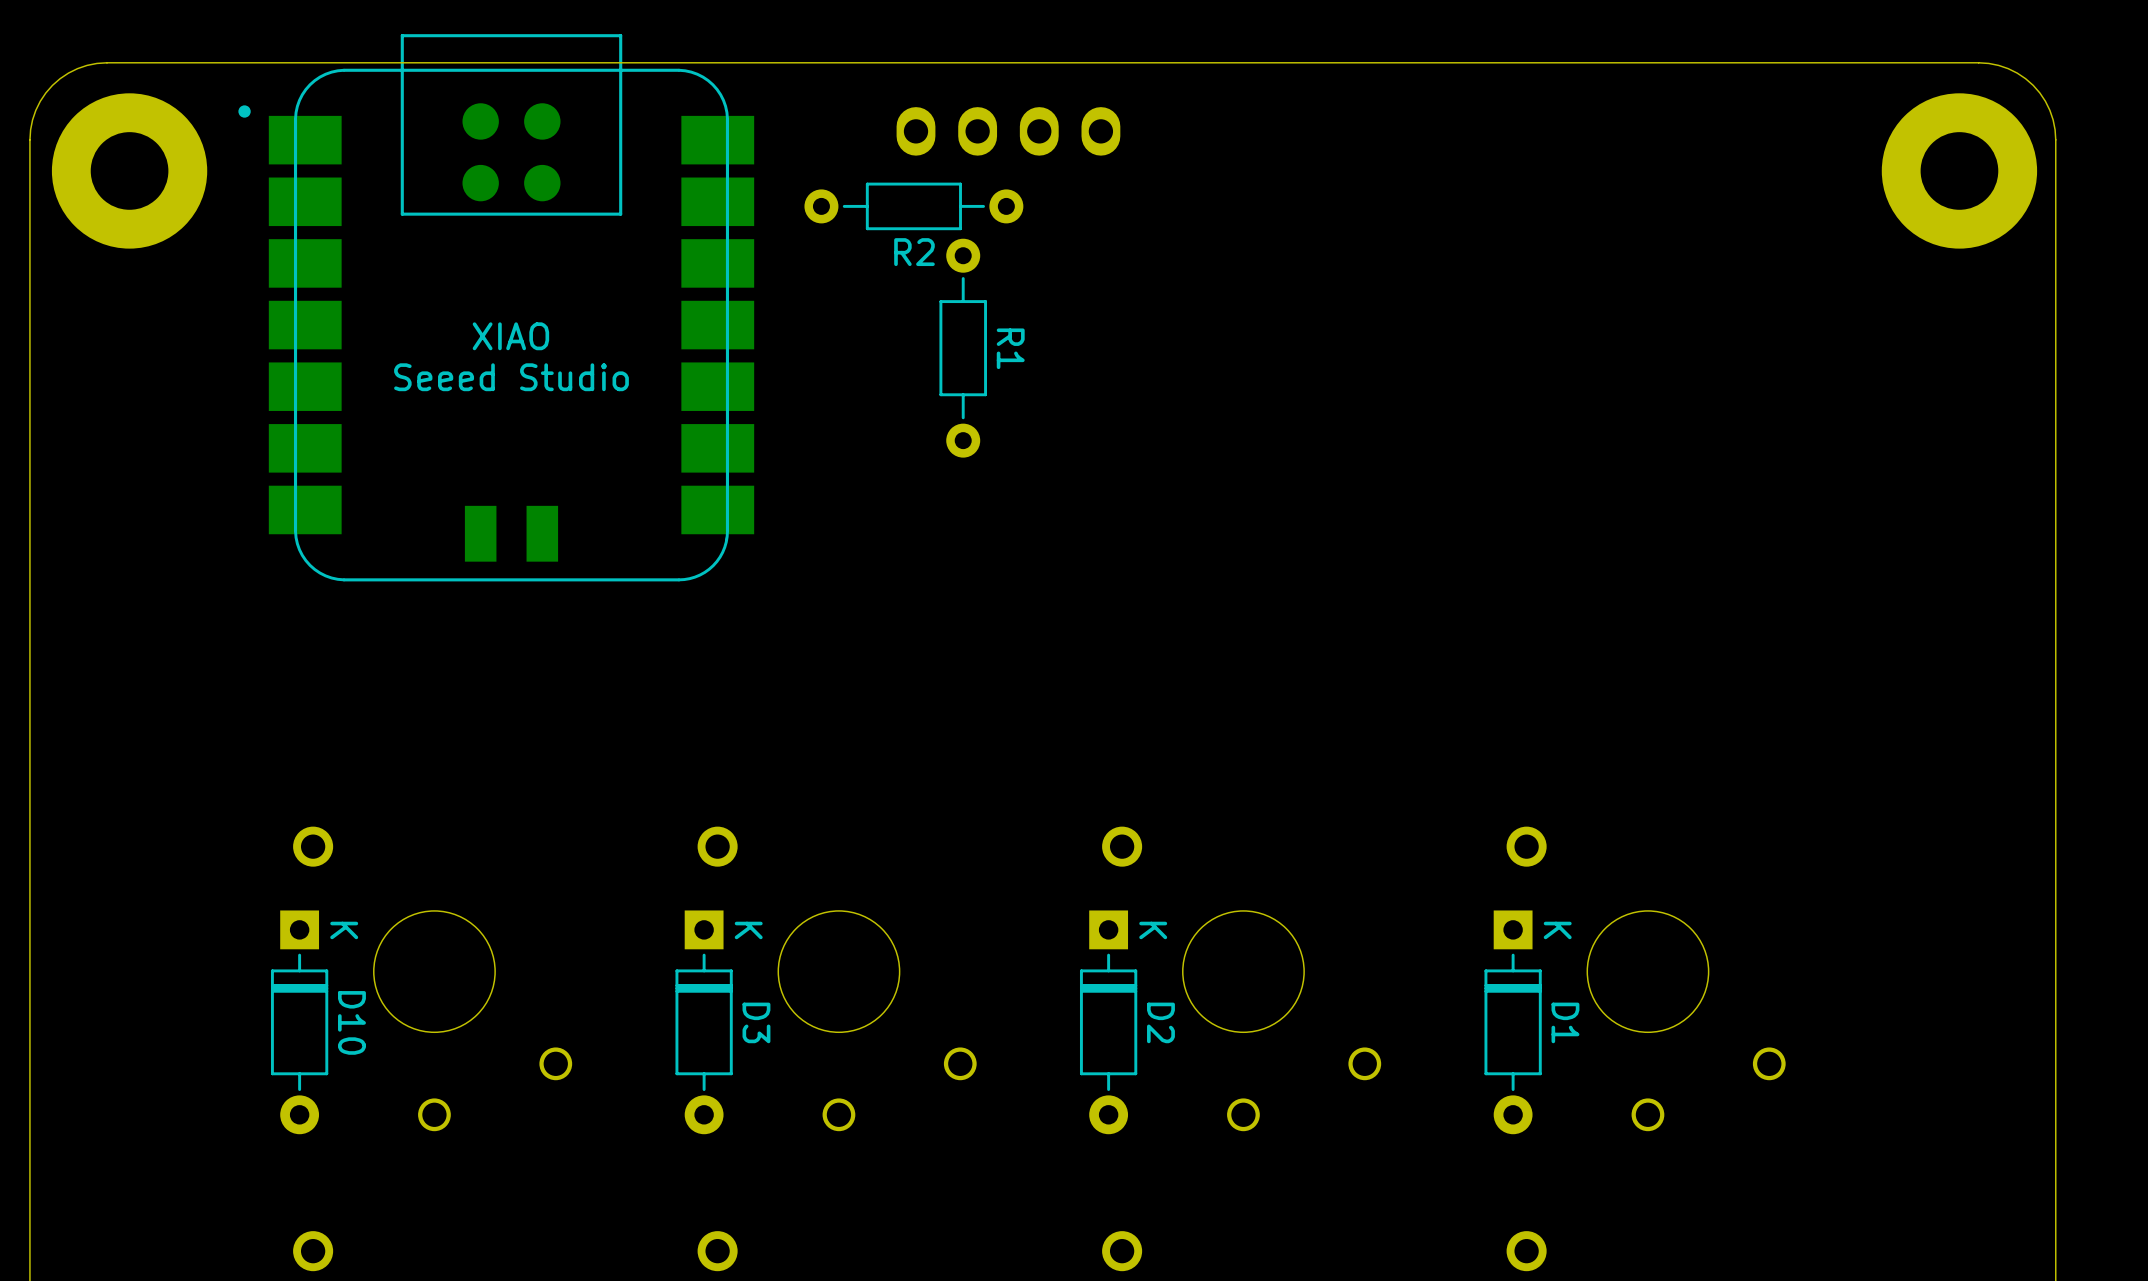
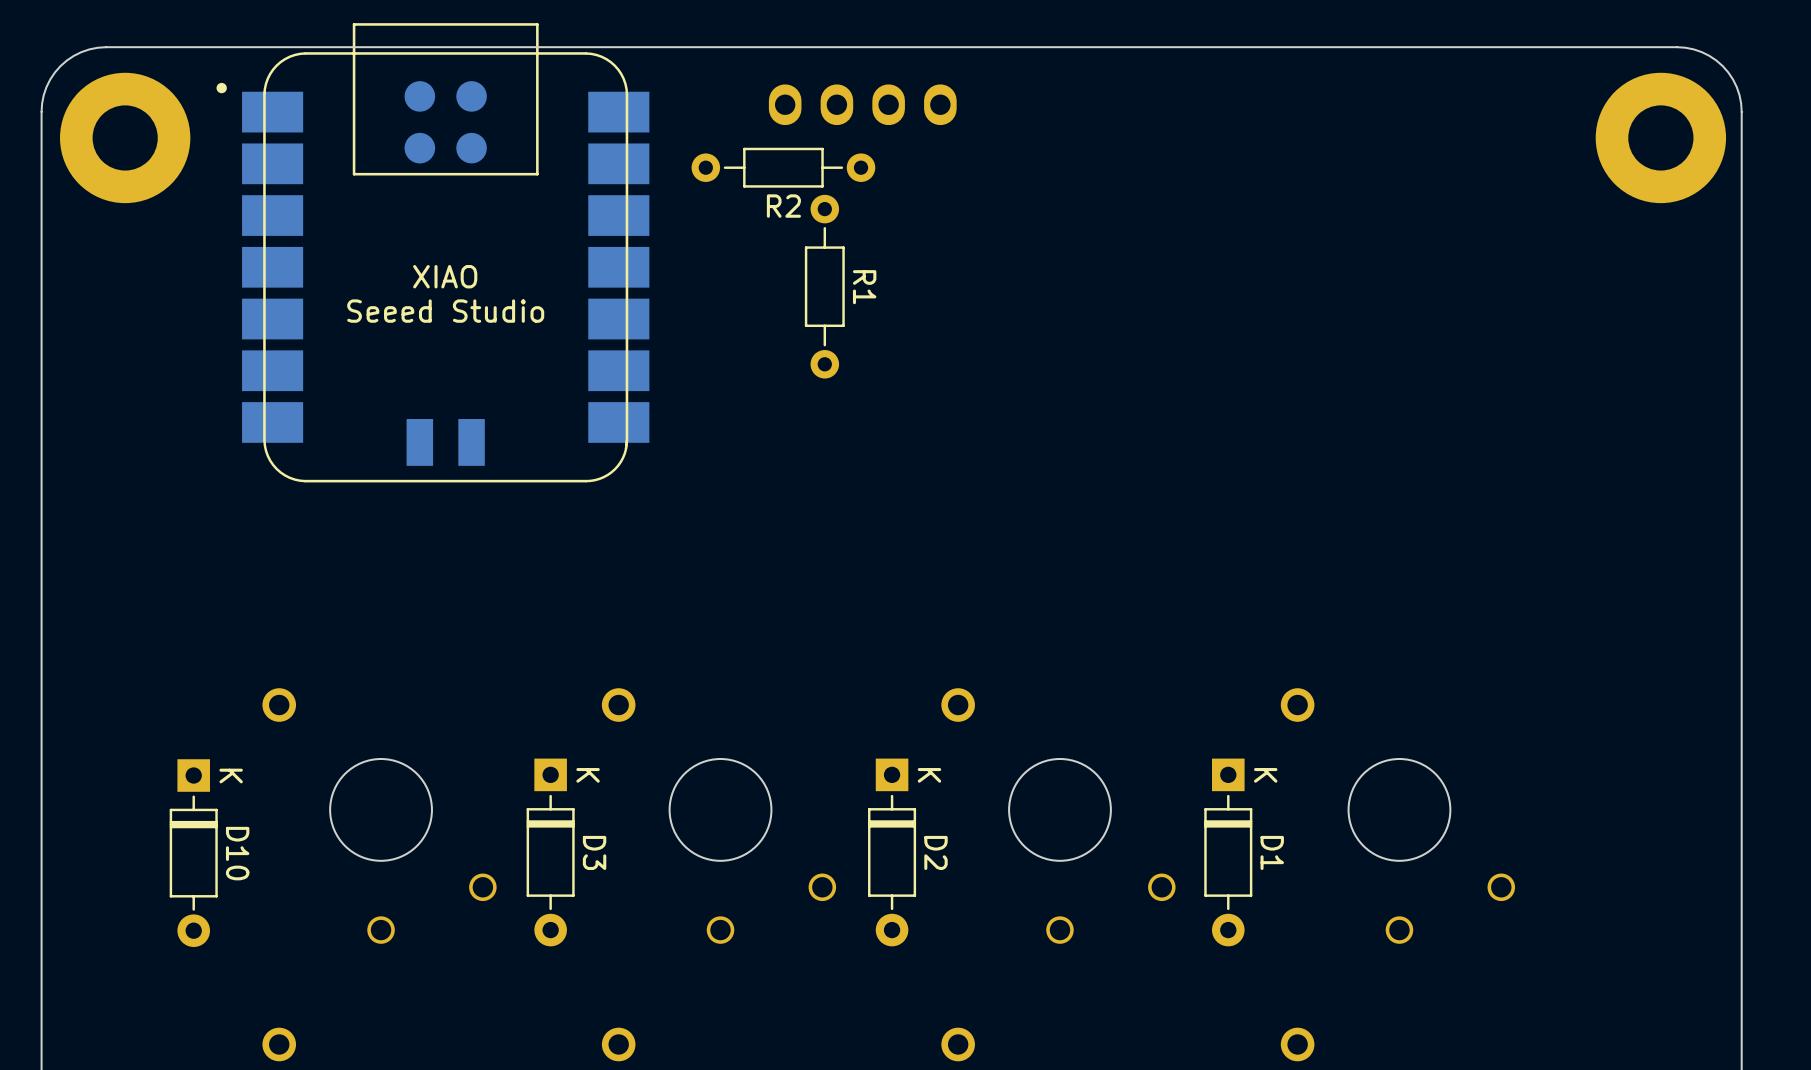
D10 position: (299, 1022) -> (193, 853)
D3 position: (704, 1022) -> (550, 852)
D2 position: (1108, 1022) -> (892, 852)
D1 position: (1513, 1022) -> (1228, 852)

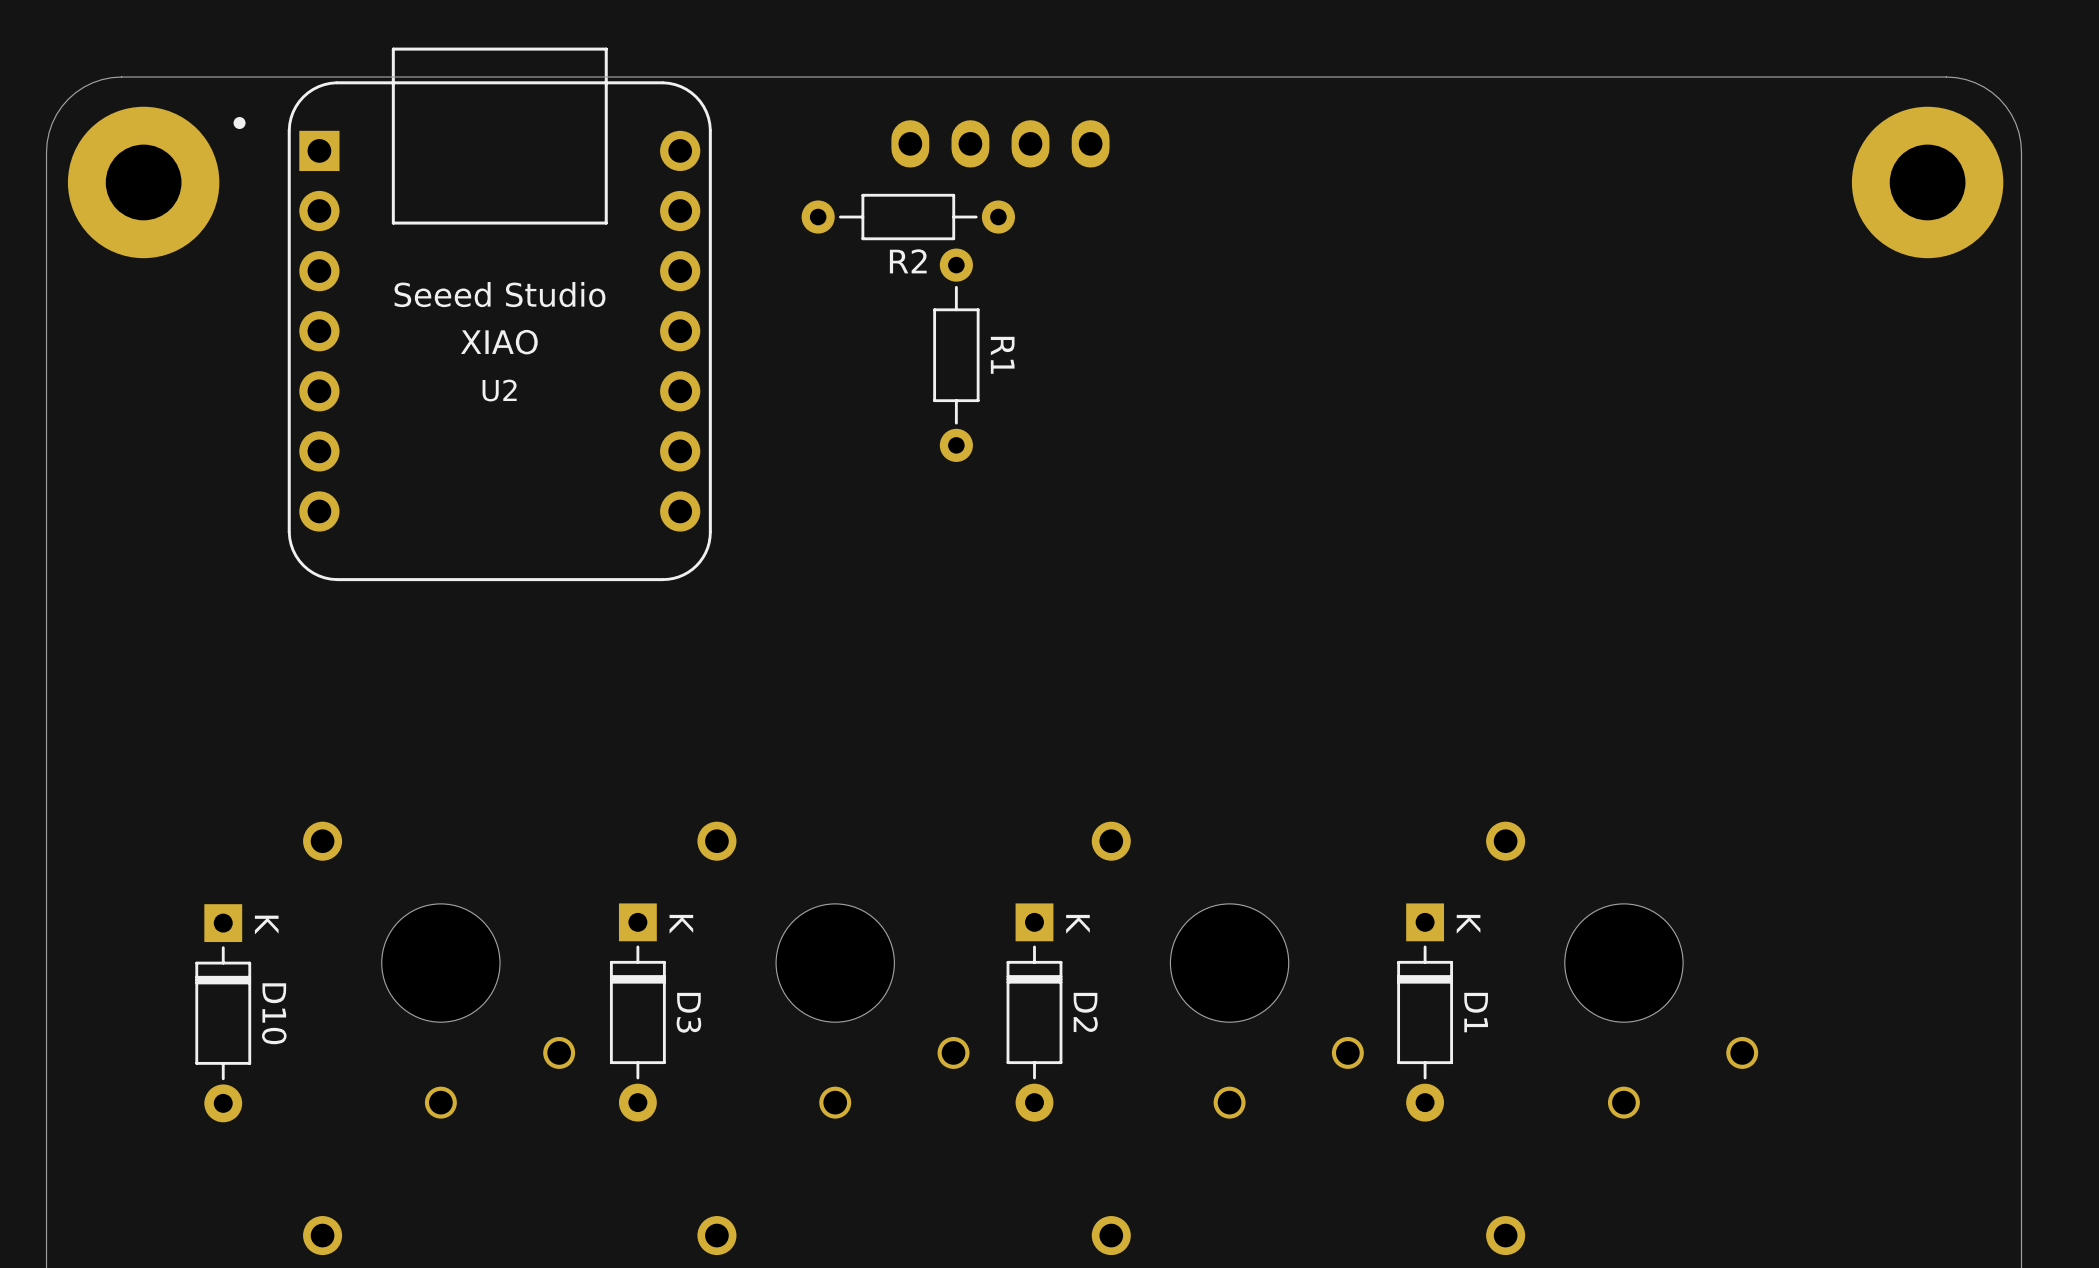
U2: none -> (472, 314)
part: (432, 252) -> none

